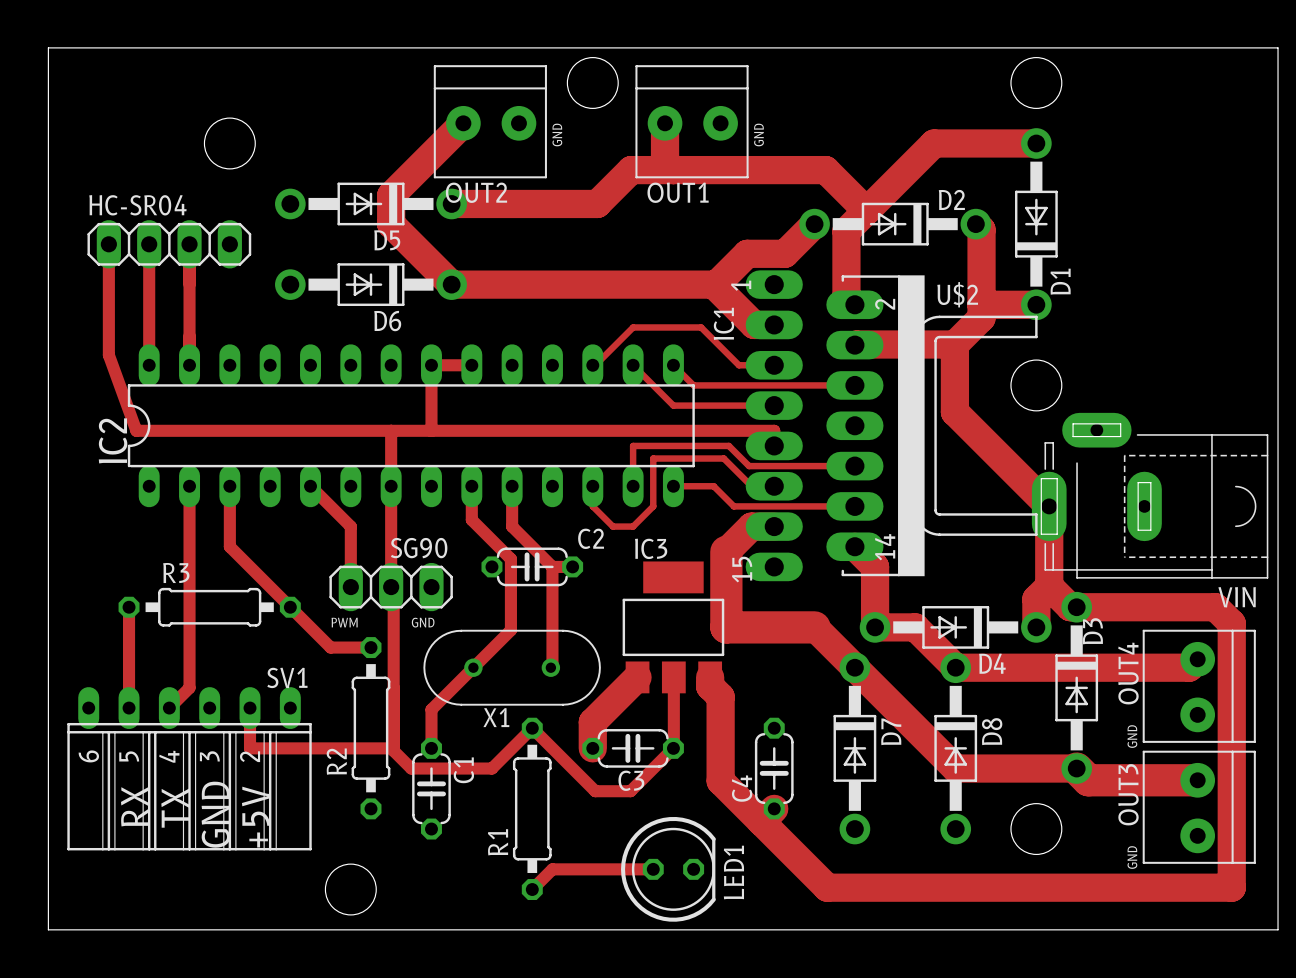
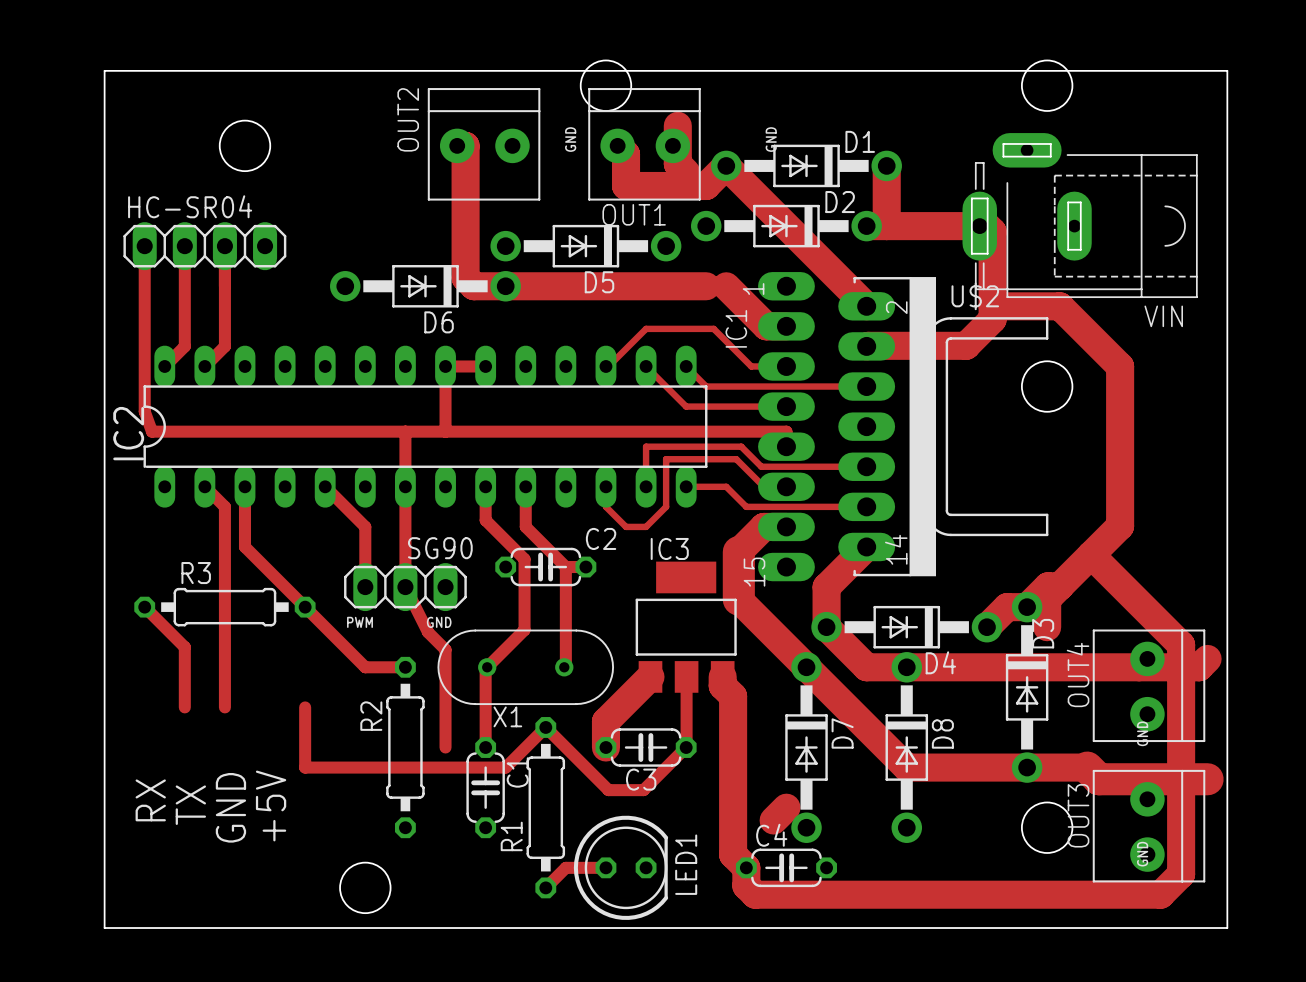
OUT2 position: (490, 121) -> (484, 144)
OUT1 position: (692, 121) -> (644, 144)
track: (463, 123) (391, 195) (391, 224) (451, 284) (460, 284) -> (457, 145) (465, 145) (465, 277) (474, 286)
track: (1036, 143) (934, 143) (846, 231) (846, 296) -> (617, 145) (626, 154) (626, 185) (706, 185) (726, 165) (858, 297)
track: none -> (886, 165) (886, 226)
OUT2 name rotation: 0° (476, 192) -> 90° counterclockwise (408, 119)
OUT2 name position: OUT2 (476, 192) -> OUT2 (408, 119)
D5 position: (371, 203) -> (585, 246)
track: (451, 203) (597, 203) (631, 170) (825, 170) (866, 210) -> none
track: (814, 224) (784, 253) (747, 253) (716, 284) (693, 284) -> none
track: none -> (866, 226) (979, 226)
D2 position: (895, 224) -> (786, 226)
D1 rotation: 0° (1036, 224) -> 90° counterclockwise (806, 165)
D1 position: (1036, 224) -> (806, 165)
track: (108, 244) (108, 355) (129, 410) -> (144, 246) (144, 411)
track: (149, 244) (149, 365) -> (184, 246) (184, 346) (164, 366)
HC-SR04 position: (169, 244) -> (204, 246)
track: (189, 244) (189, 365) -> (224, 246) (224, 346) (204, 366)
D6 position: (371, 284) -> (425, 286)
track: none -> (1047, 306) (1059, 306) (1120, 366) (1120, 526) (1059, 586) (1047, 586) (1027, 607) (1007, 607) (987, 627)
track: (954, 344) (954, 412) (1049, 506) (1049, 586) (1070, 607) (1215, 607) (1231, 623) (1231, 887) (827, 887) (720, 781) -> (1091, 555) (1181, 644) (1181, 874) (1160, 894) (755, 894) (746, 885) (746, 867) (733, 854) (733, 780)
track: (189, 486) (189, 687) (169, 708) -> (204, 486) (224, 506) (224, 707)
VIN position: (1150, 495) -> (1080, 215)
track: (854, 546) (875, 566) (875, 627) (915, 627) (955, 667) -> none
track: (393, 592) (393, 750) (411, 768) -> (407, 592) (427, 632) (445, 649) (445, 708)
track: (726, 599) (726, 627) (814, 627) -> (866, 546) (826, 587) (826, 627)
track: none -> (738, 599) (906, 767) (966, 767)
track: (129, 607) (129, 708) -> (144, 607) (184, 647) (184, 707)
D4 position: (955, 627) -> (906, 627)
track: (330, 647) (371, 647) -> (345, 647) (365, 667) (405, 667)
track: (854, 667) (955, 768) -> (866, 667) (966, 667)
track: (471, 669) (431, 709) -> (485, 668) (485, 747)
OUT4 position: (1199, 686) -> (1149, 685)
D3 position: (1076, 687) -> (1027, 687)
track: (250, 708) (250, 748) (393, 748) -> none
track: none -> (305, 707) (305, 767) (425, 767)
R2 position: (371, 728) -> (405, 747)
D7 position: (854, 748) -> (806, 747)
D8 position: (955, 748) -> (906, 747)
R2 name position: R2 (336, 761) -> R2 (371, 716)
SV1: (189, 768) -> none
C4 rotation: 0° (774, 768) -> 90° clockwise (786, 867)
C4 position: (774, 768) -> (786, 867)
C1 position: (431, 788) -> (485, 787)
OUT3 position: (1199, 807) -> (1149, 826)
track: (592, 869) (653, 869) -> none
LED1 position: (668, 869) -> (621, 867)
board edge: (88, 929) (48, 929) (48, 47) (1278, 47) (1278, 929) (1217, 929) -> (104, 928) (104, 70) (1227, 70) (1227, 928)

